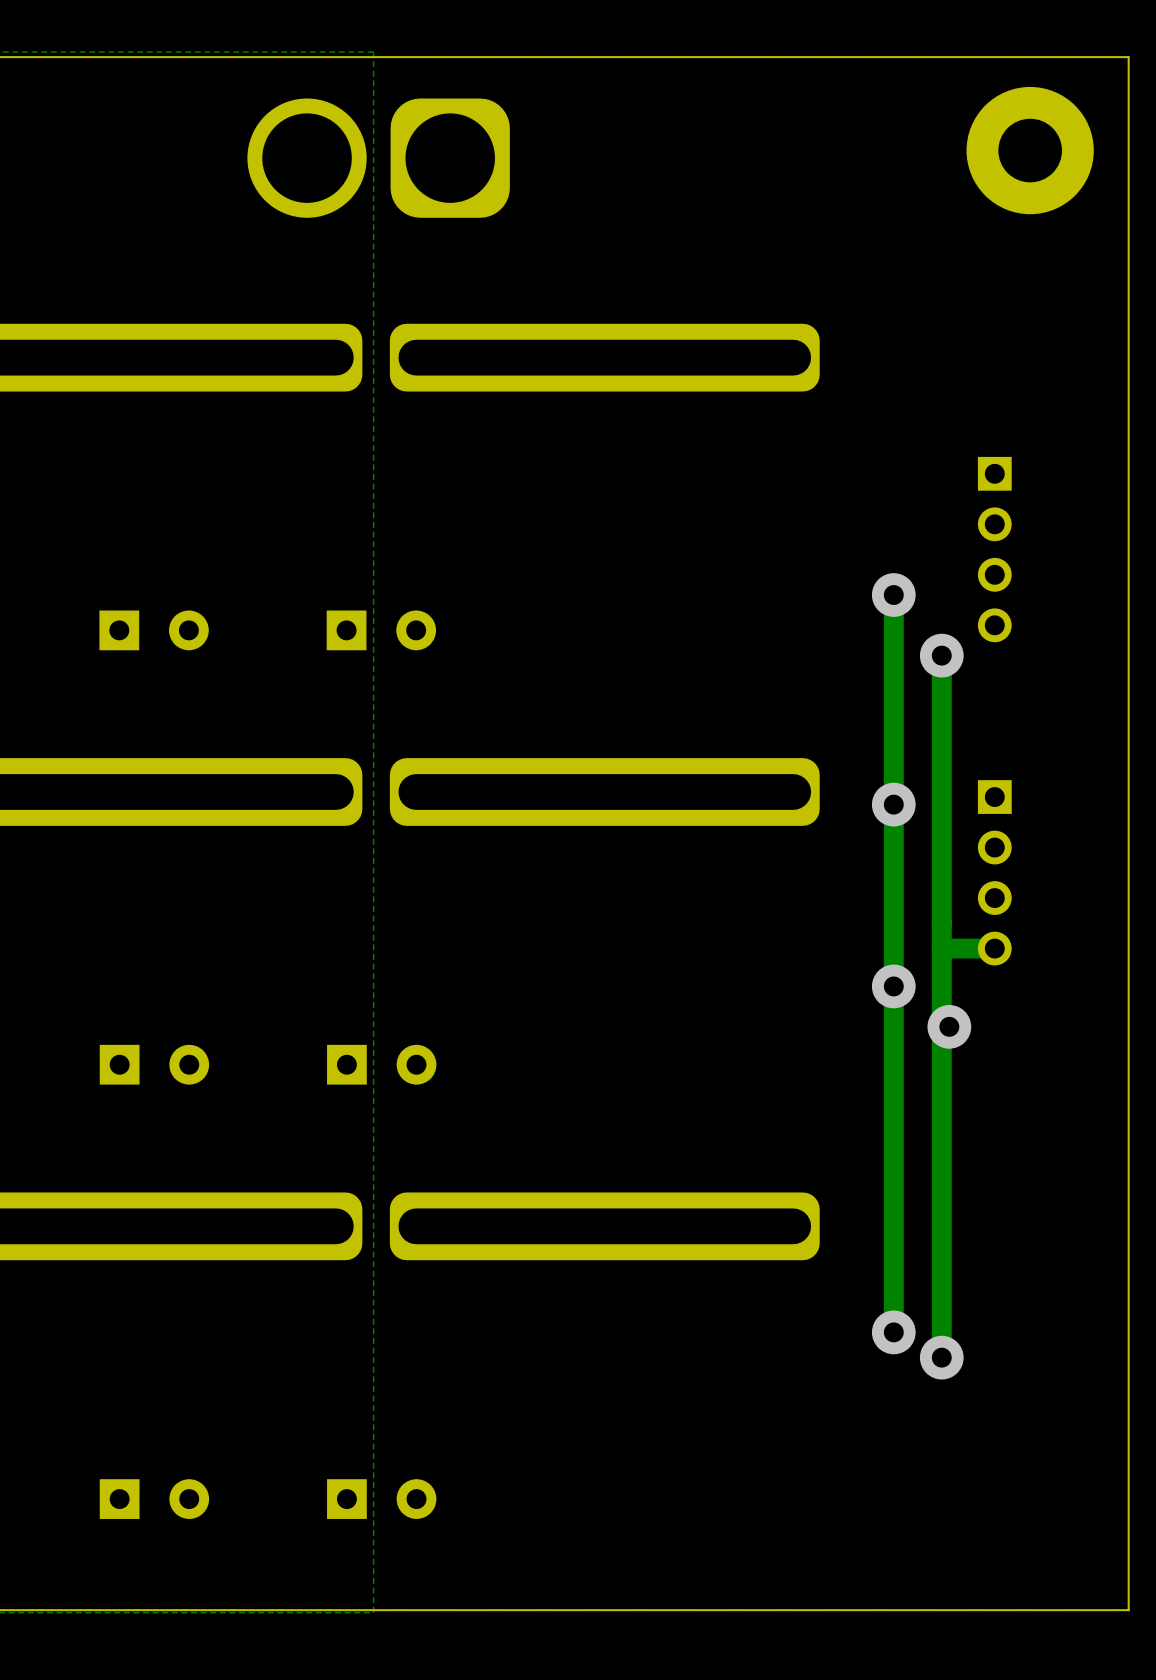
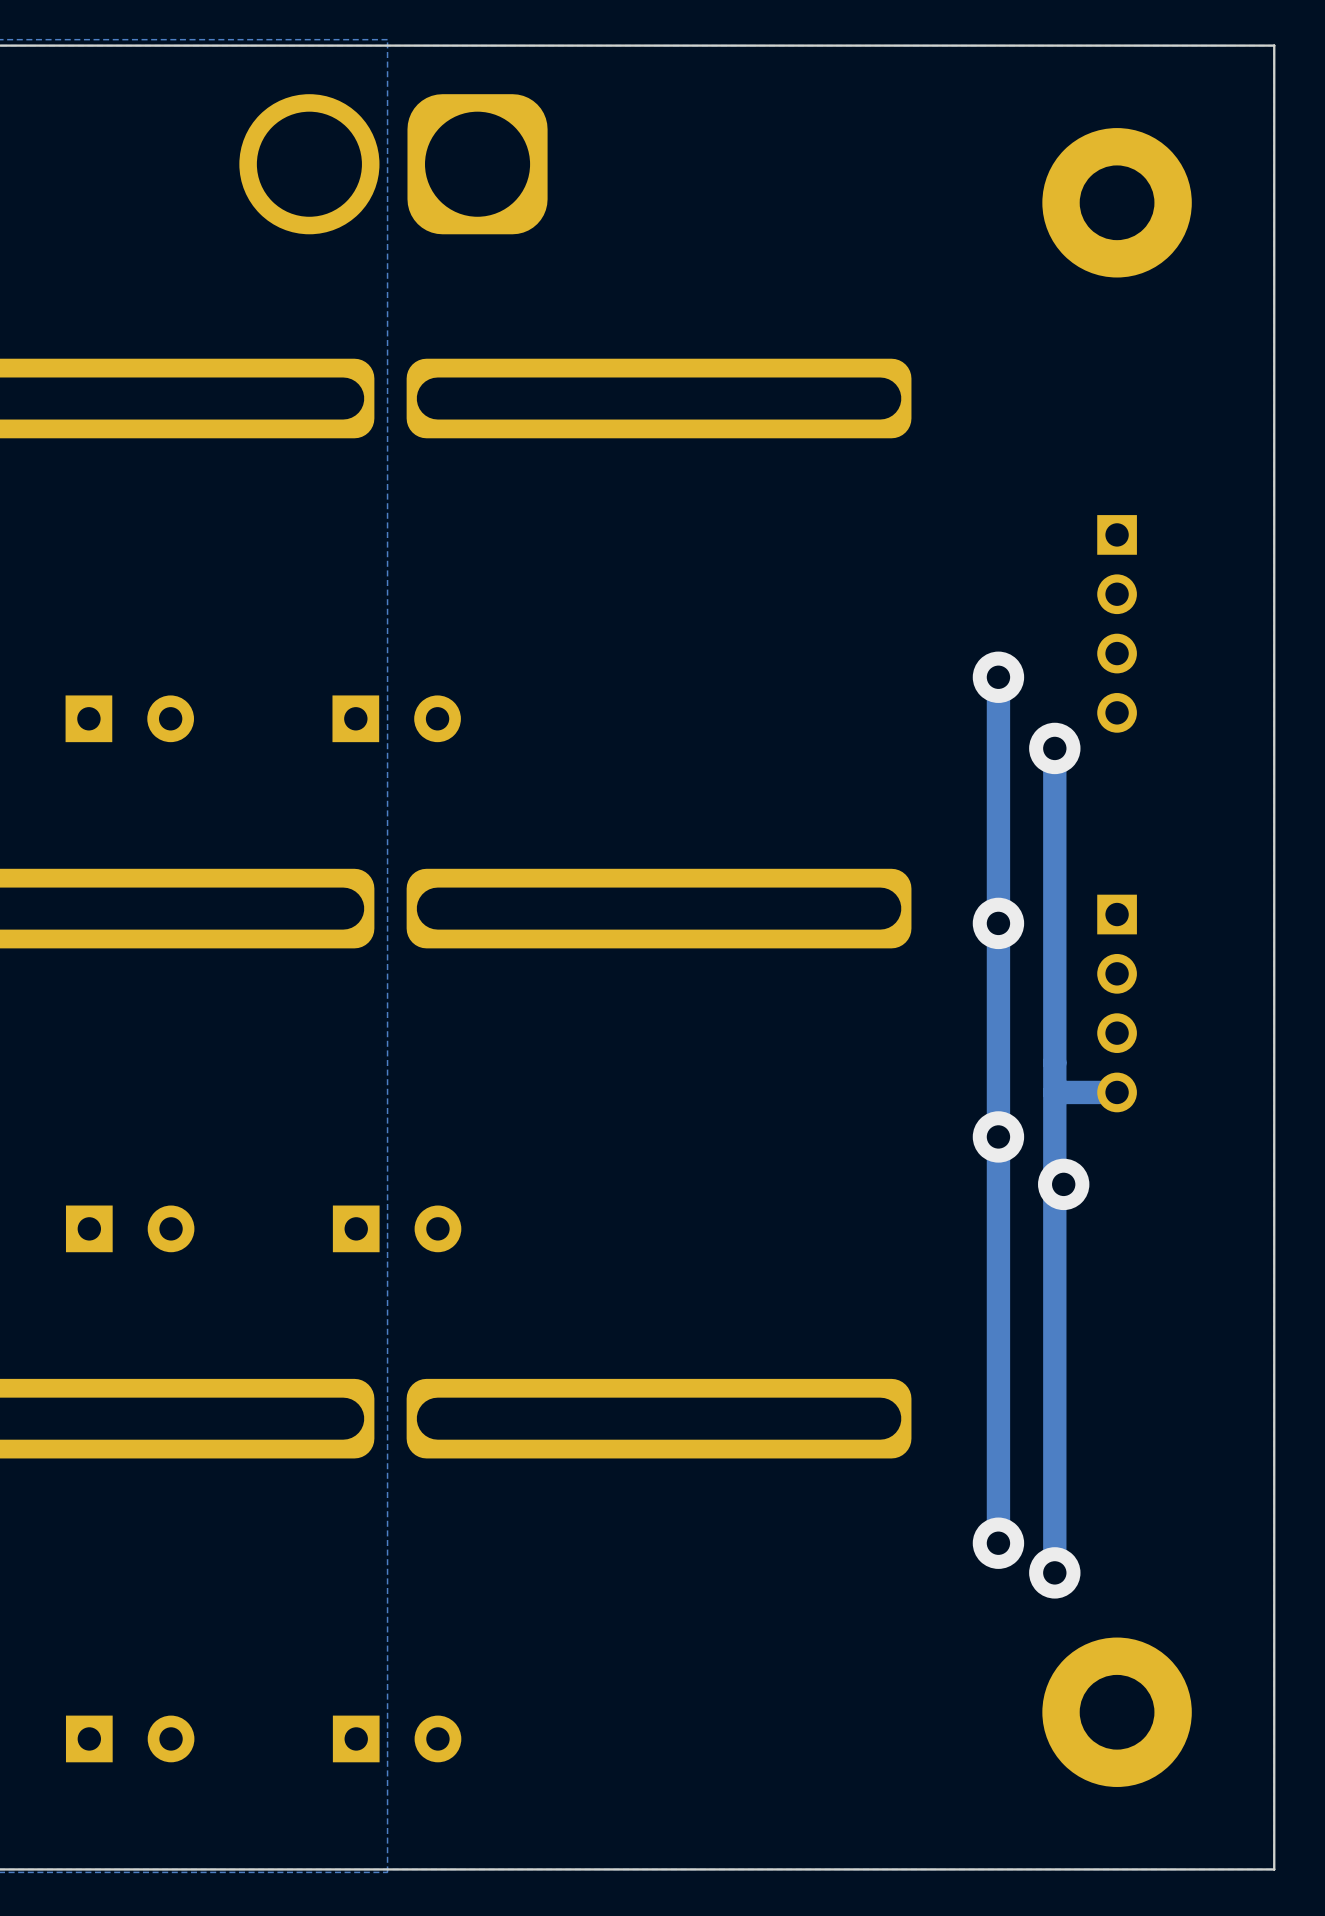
part position: (1030, 150) -> (1117, 202)
part: none -> (1117, 1712)

